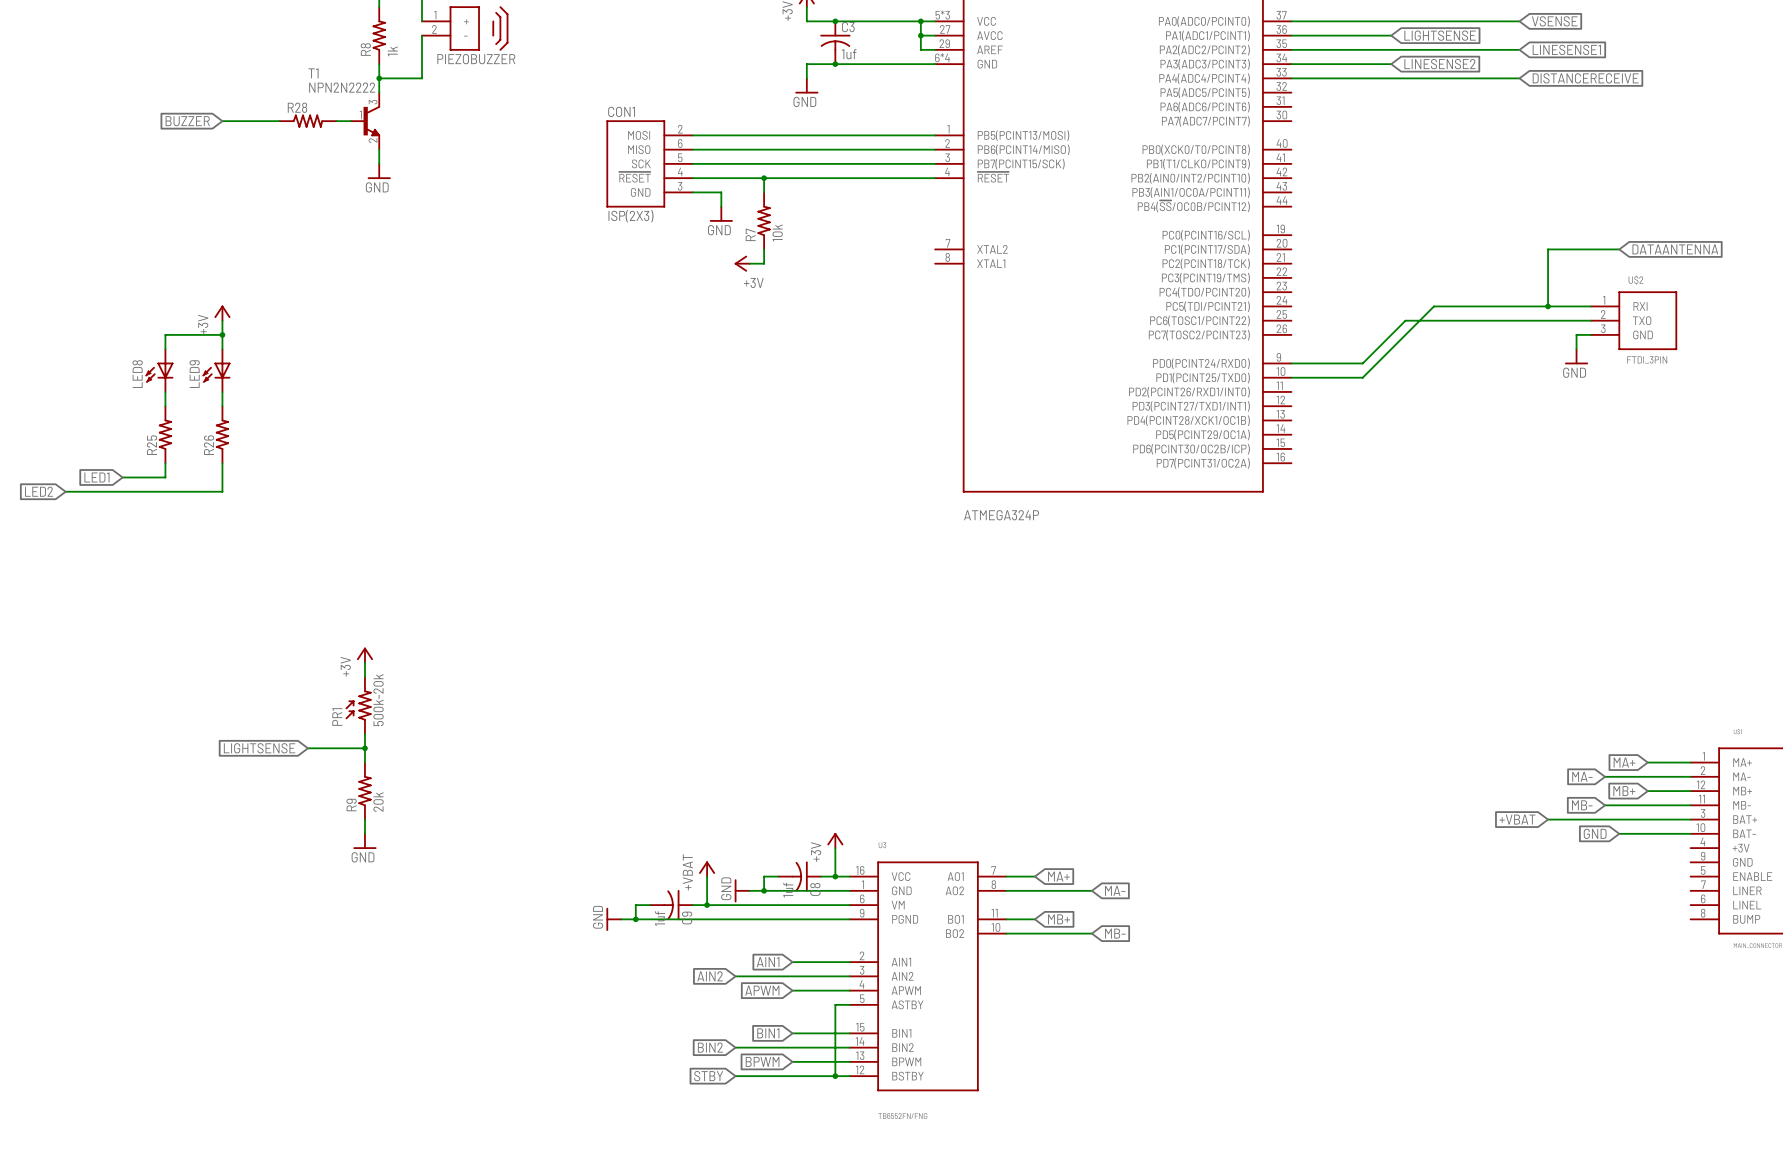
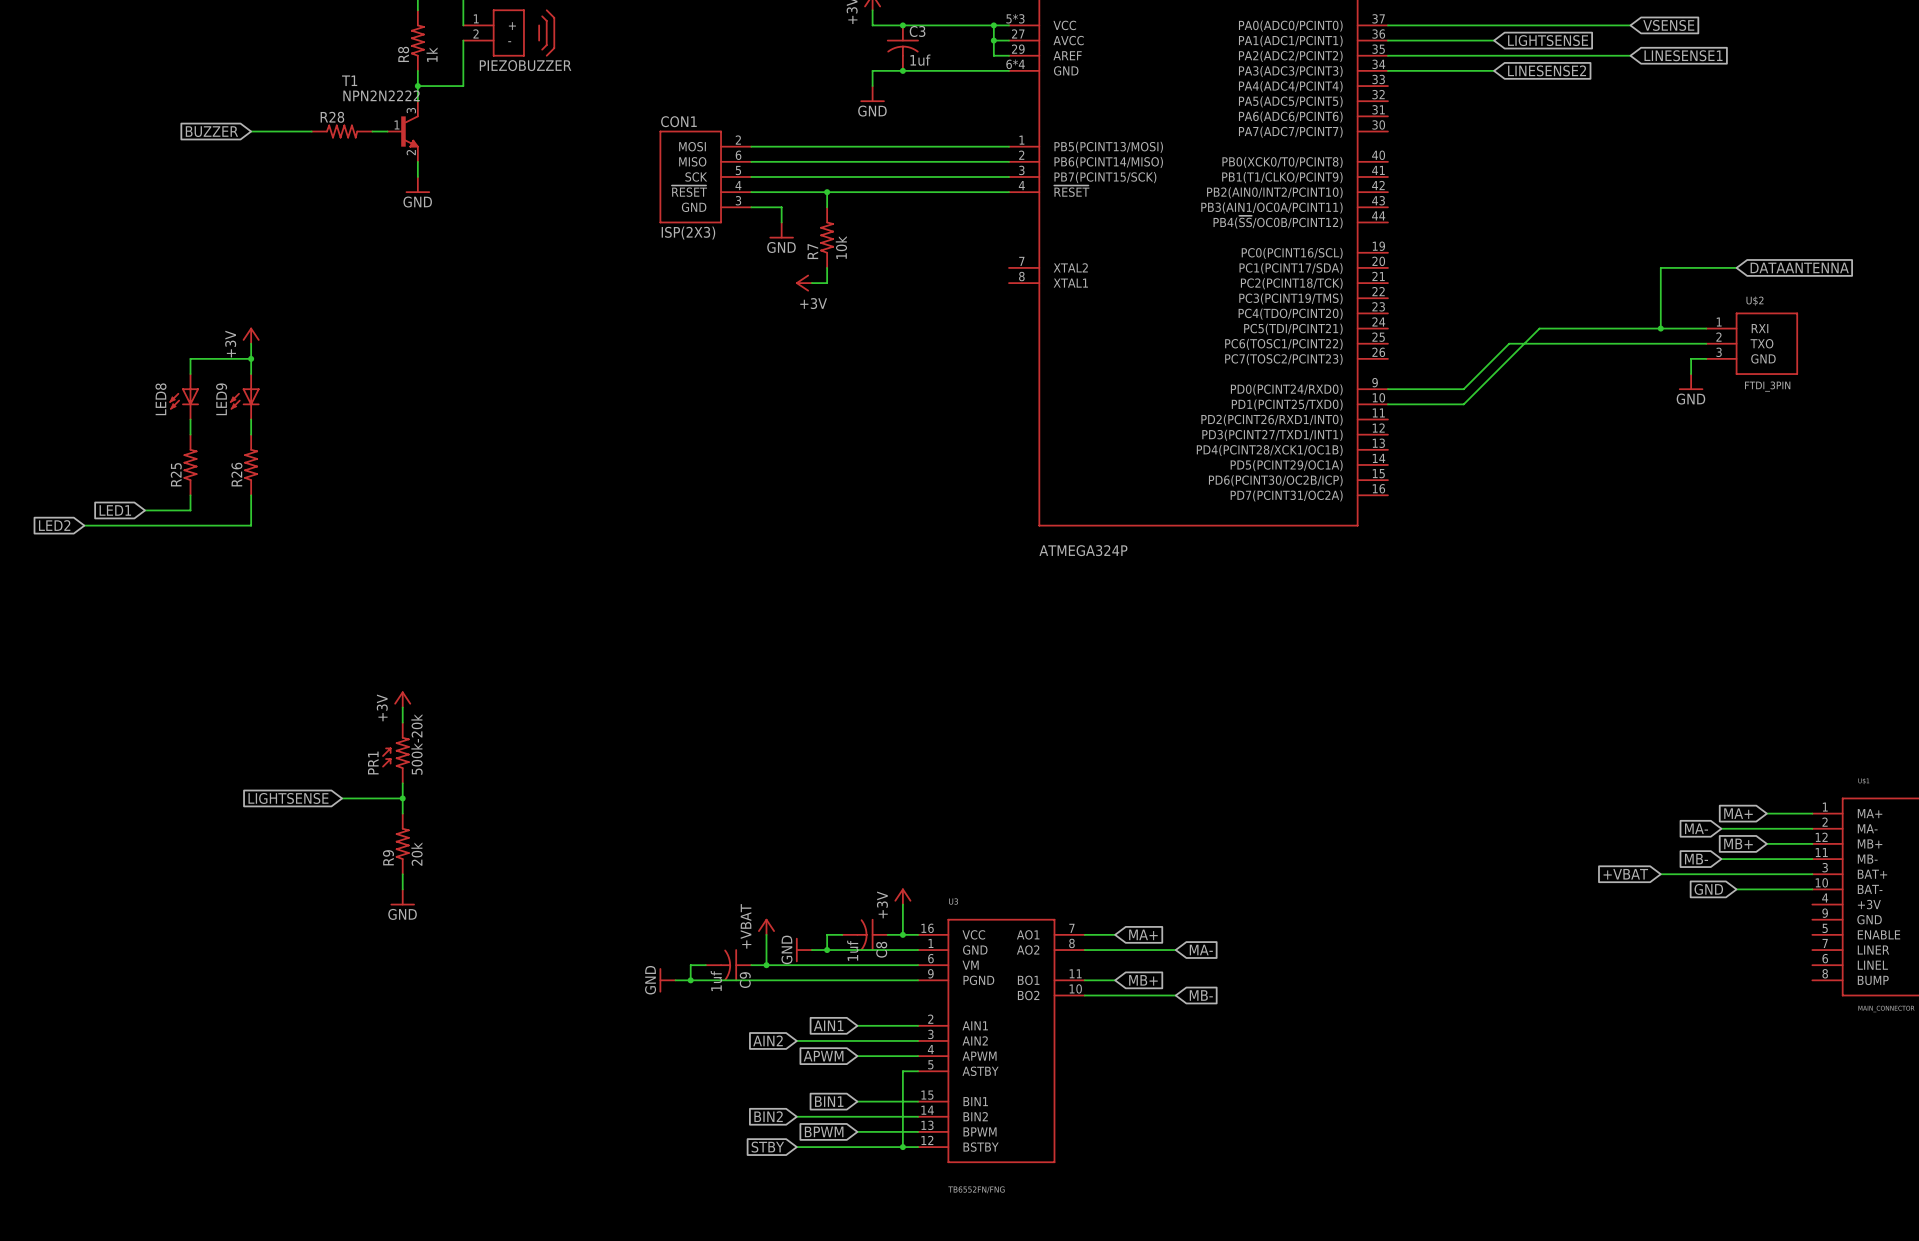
wire: (1291, 78) (1519, 78) -> none
global label: DISTANCERECEIVE (1585, 78) -> none

